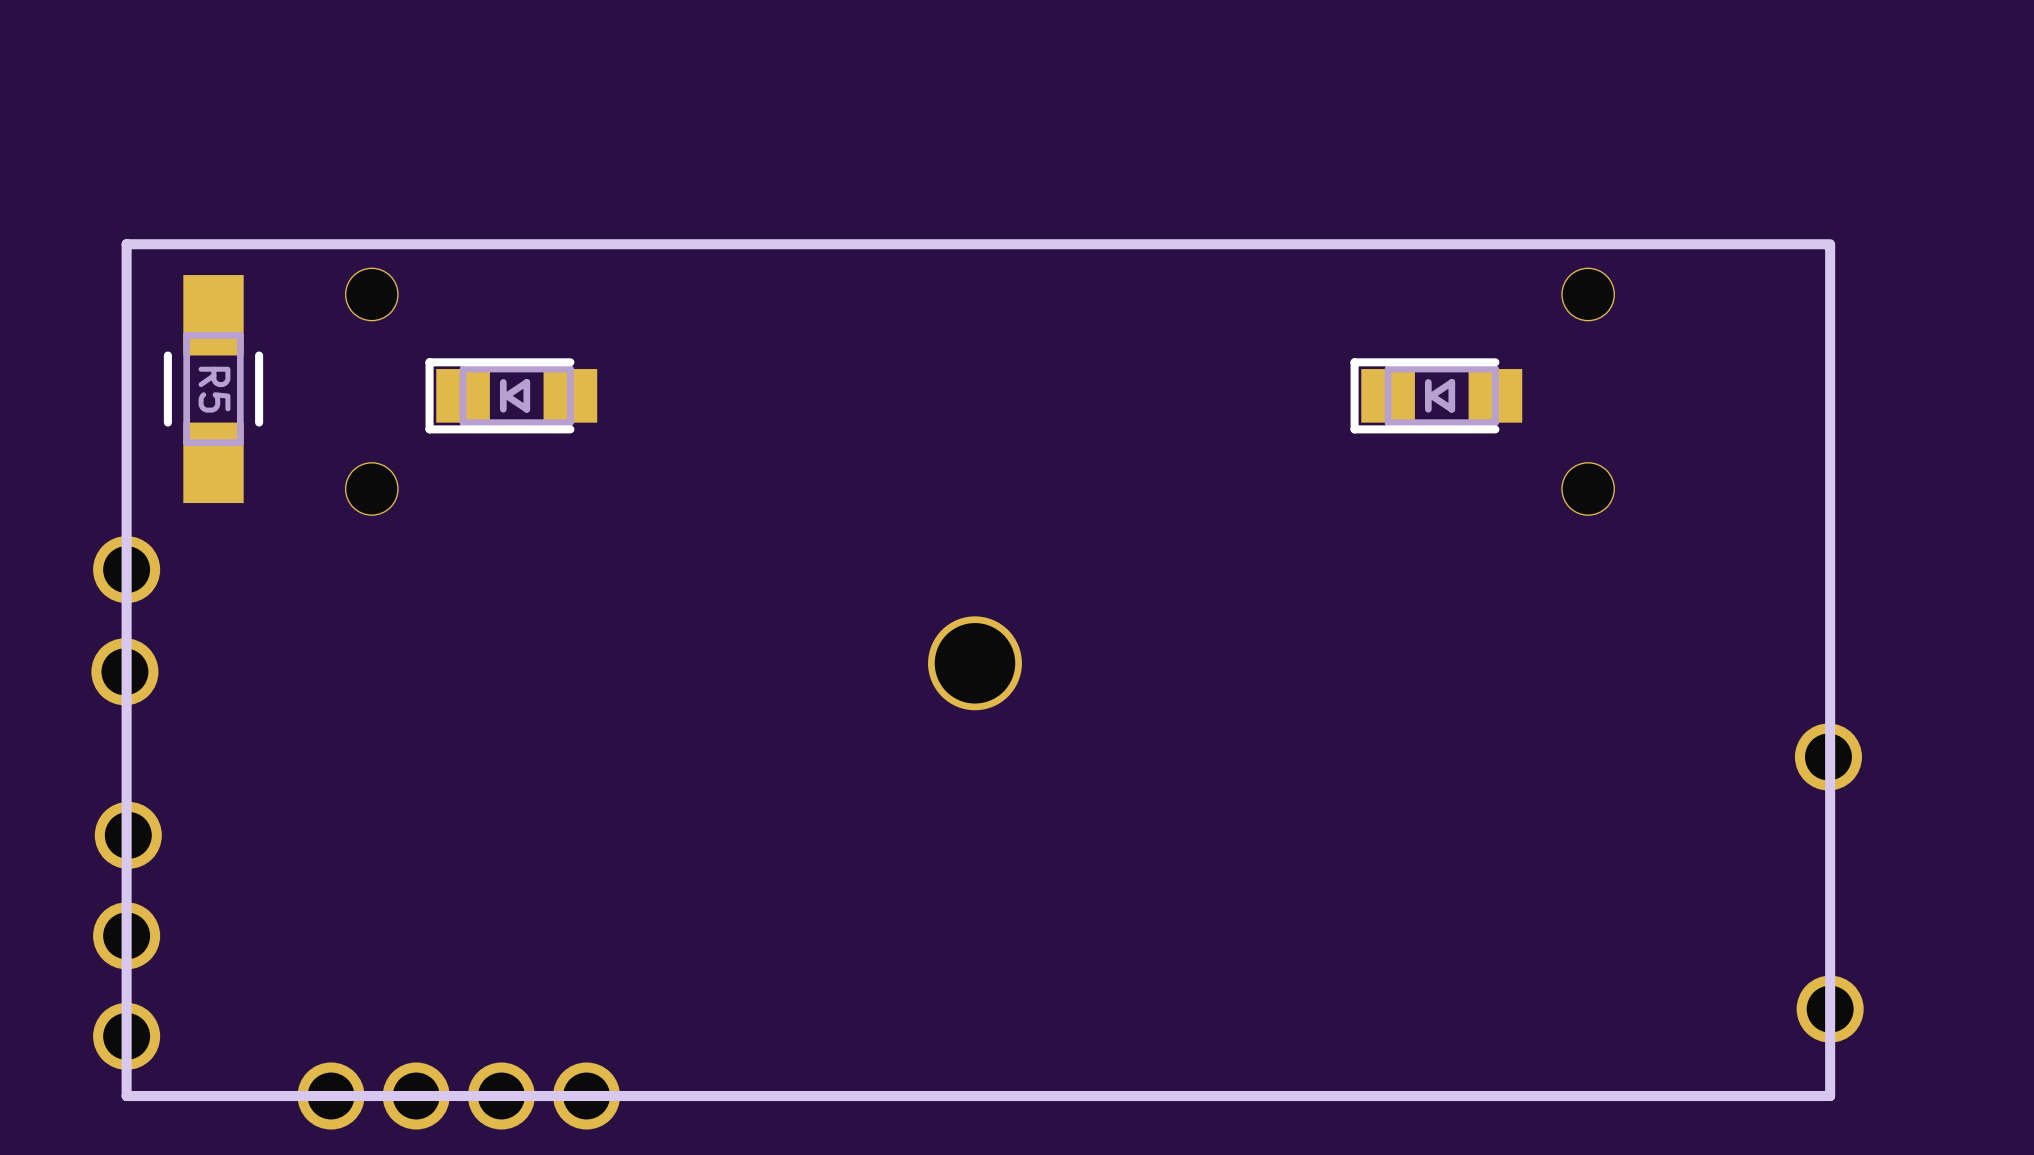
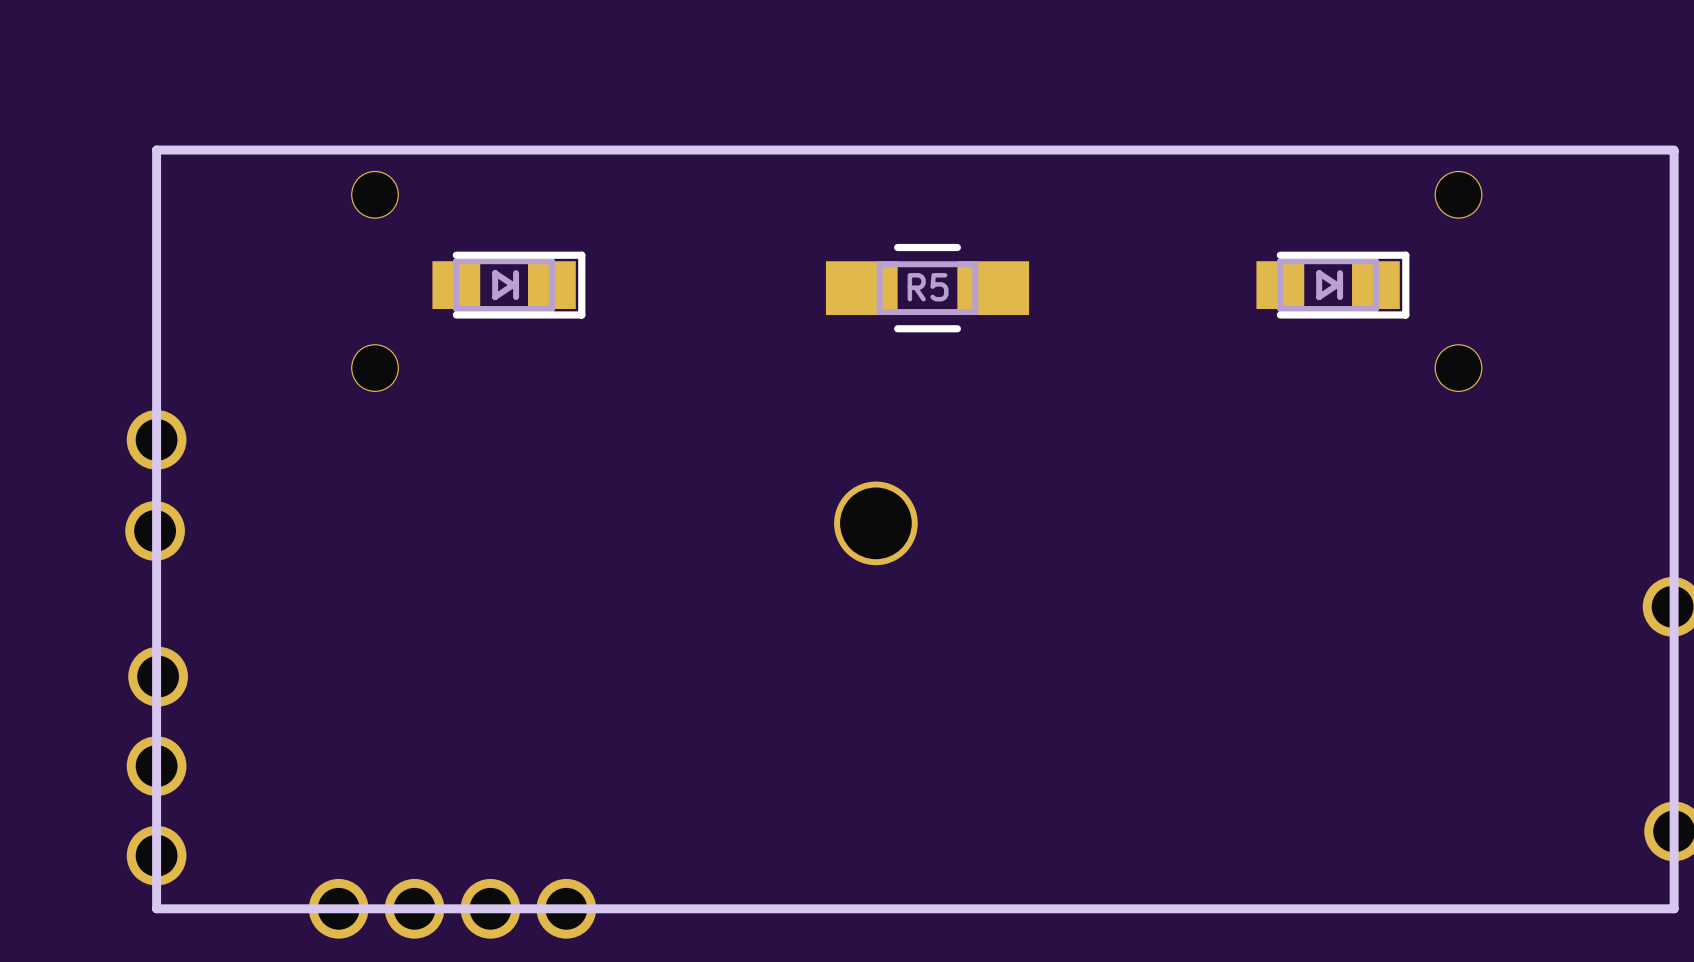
R5 rotation: 0° (213, 389) -> 90° clockwise (927, 288)
R5 position: (213, 389) -> (927, 288)
part rotation: 0° (511, 395) -> 180° (508, 285)
part rotation: 0° (1436, 395) -> 180° (1332, 285)
part position: (974, 663) -> (875, 523)

